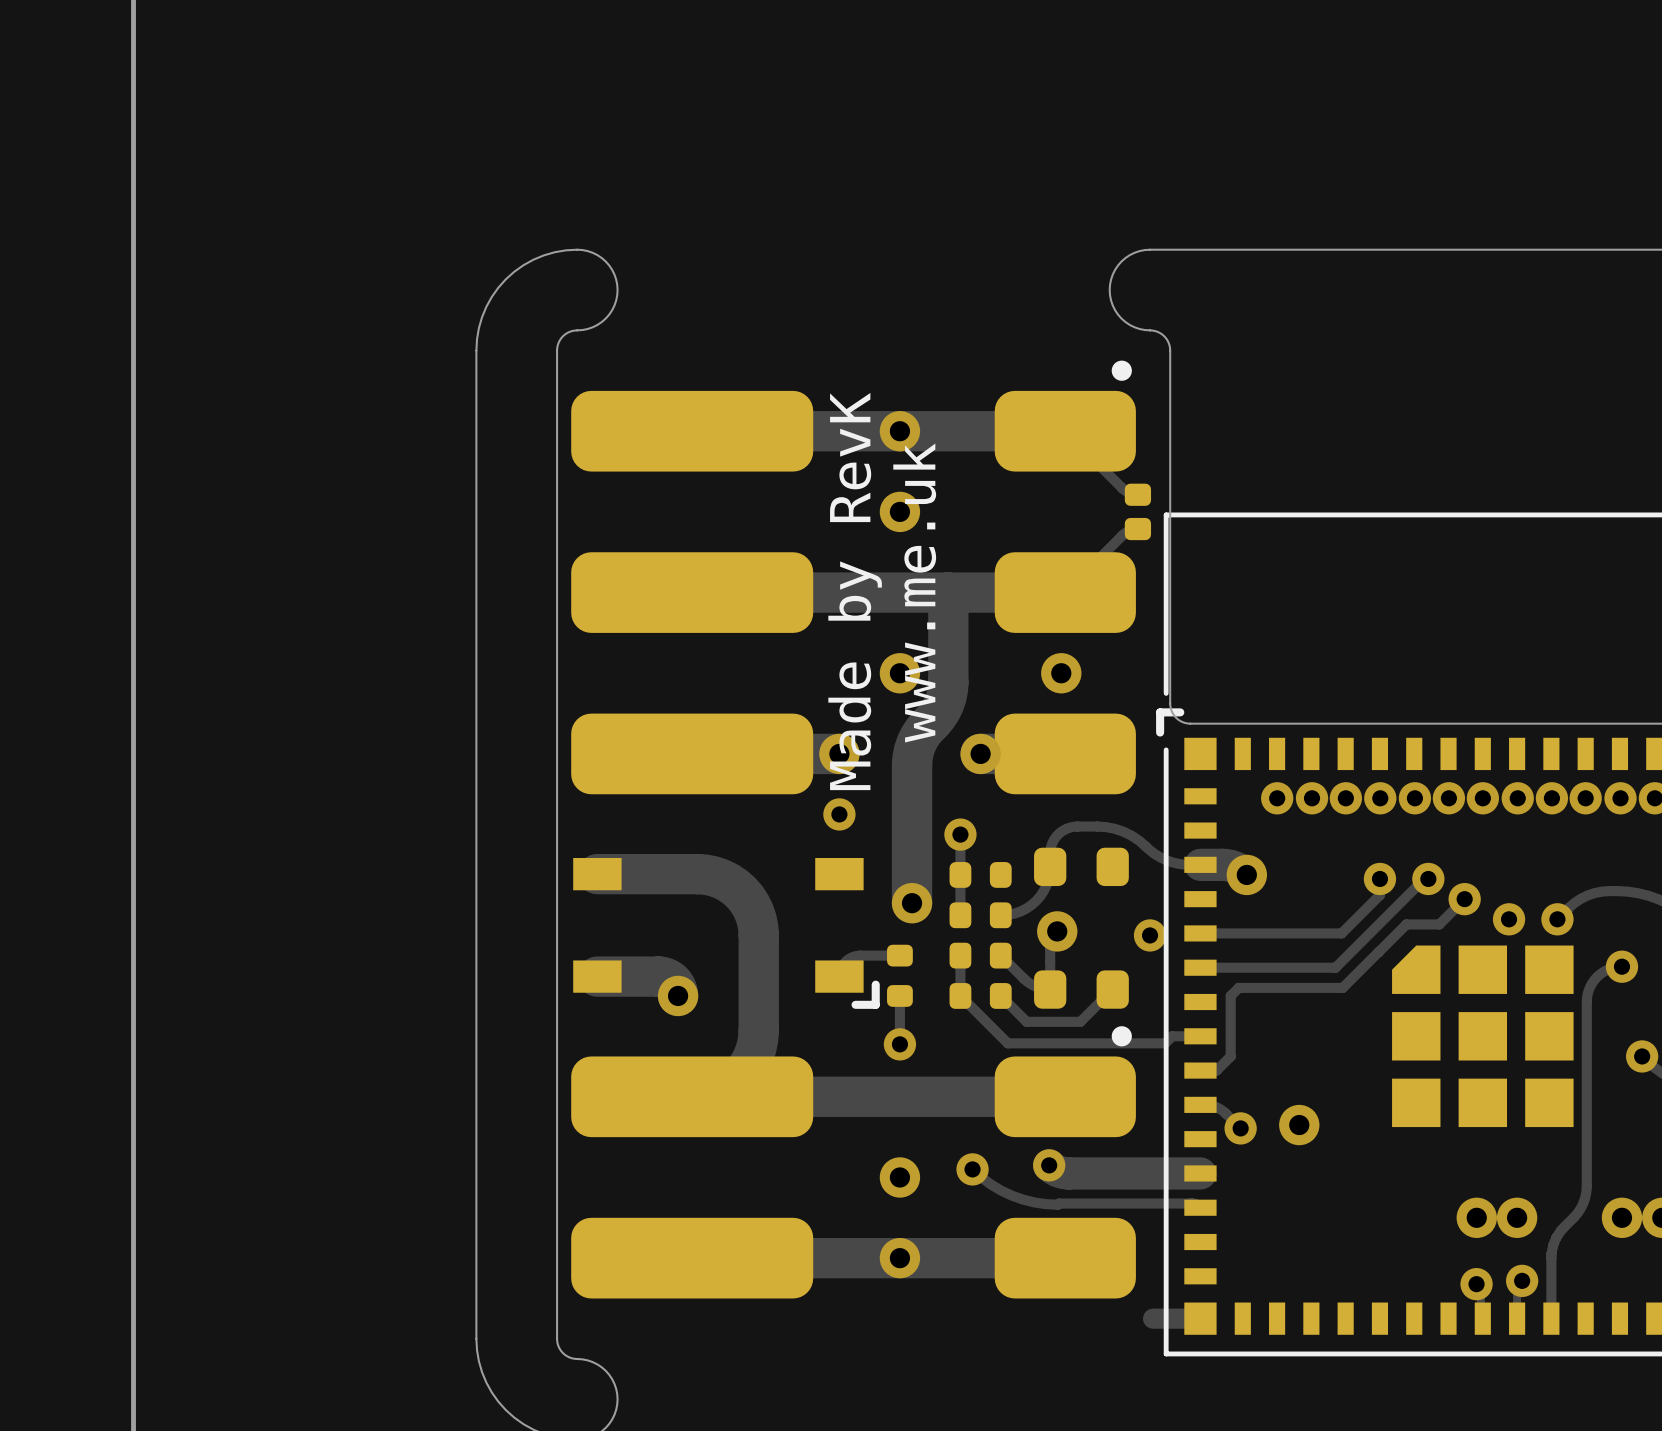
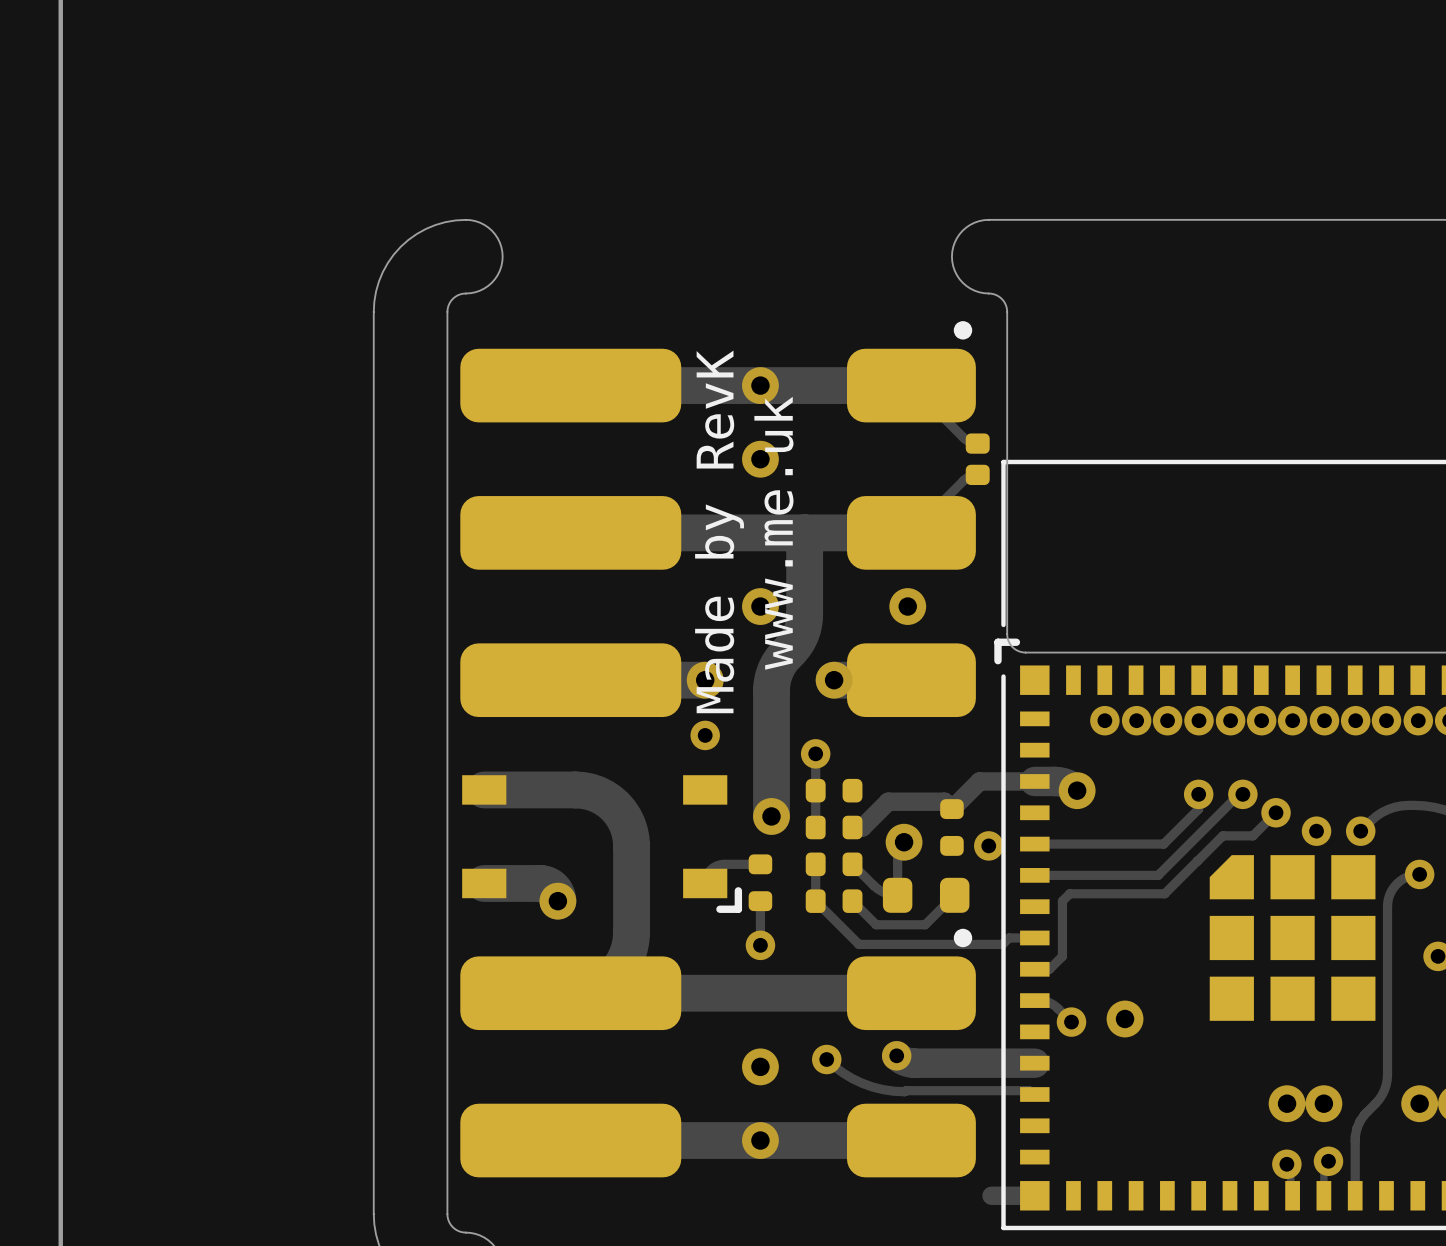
track: (1050, 853) (1055, 837) (1067, 828) (1077, 826) (1106, 827) (1131, 835) (1155, 854) (1166, 860) (1189, 864) -> none
track: (1050, 866) (1046, 885) (1036, 901) (1020, 911) (1001, 915) -> (1034, 781) (979, 781) (951, 809) (944, 801) (888, 801) (862, 827) (852, 827)
part: (1081, 866) -> none
part: none -> (951, 827)

